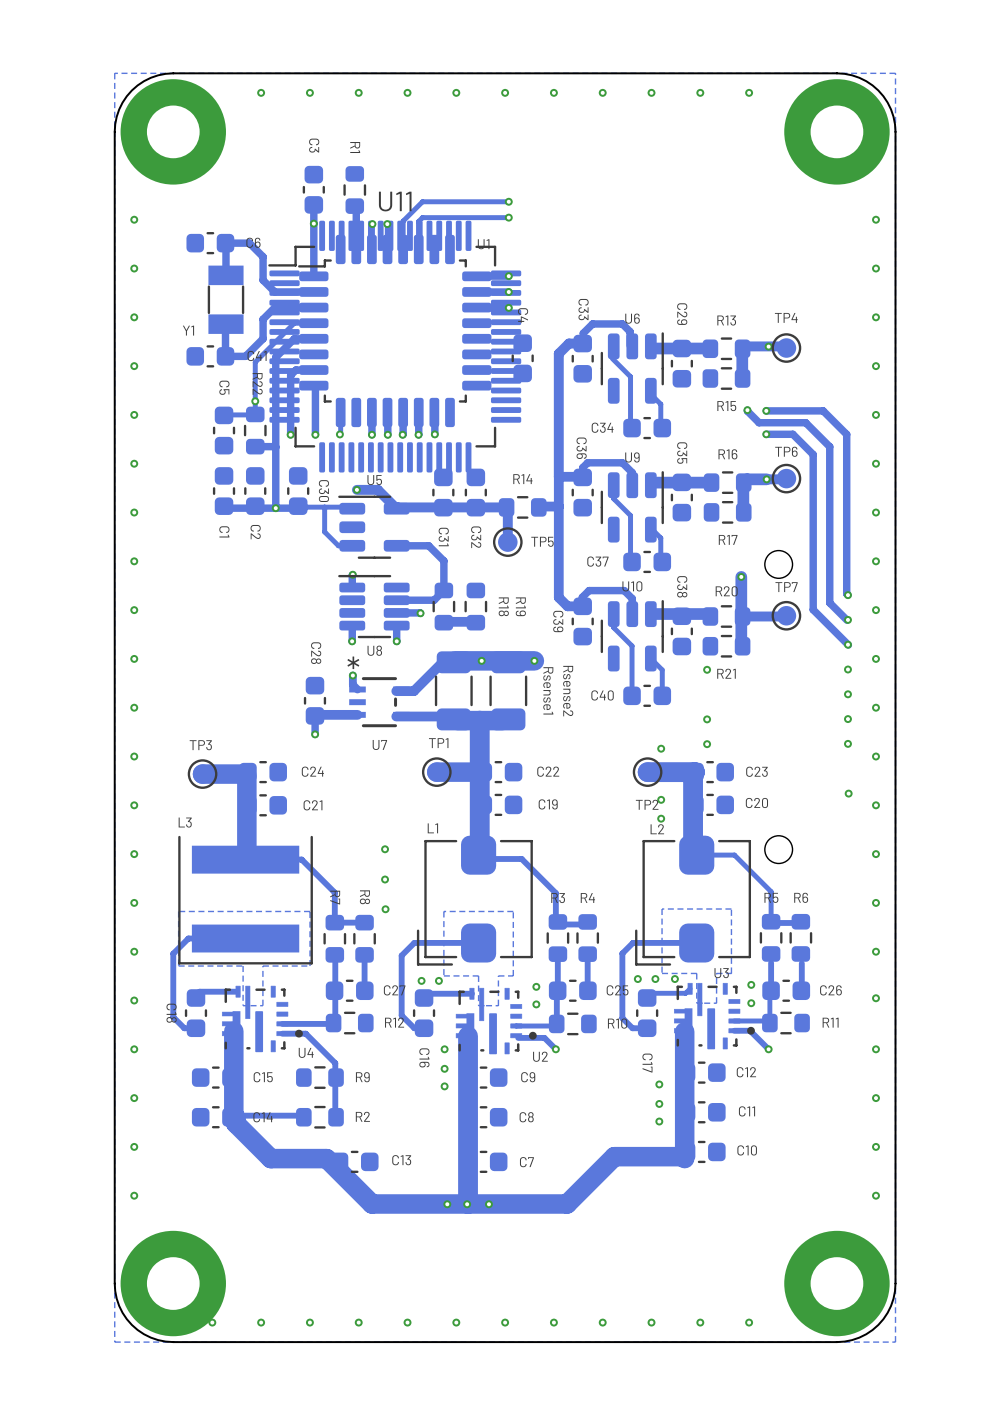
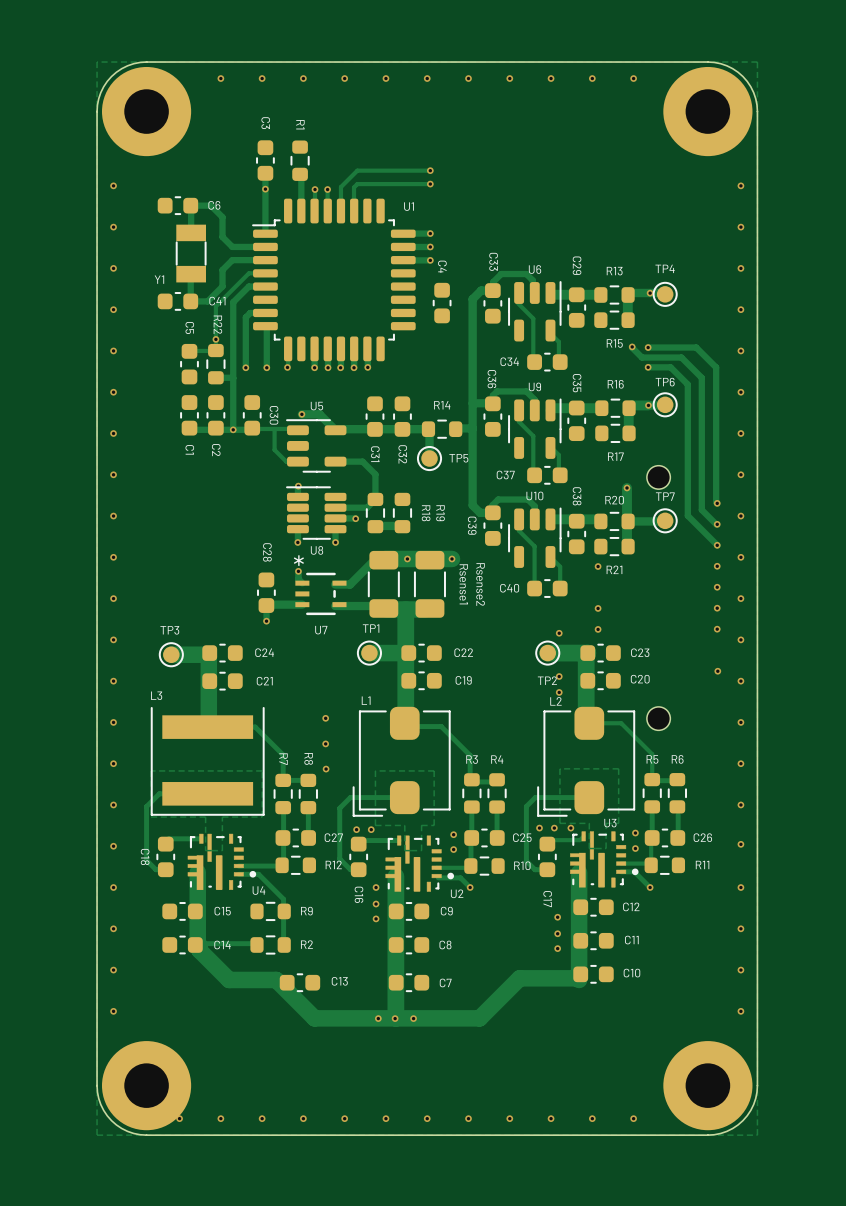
U11: (394, 346) -> none

